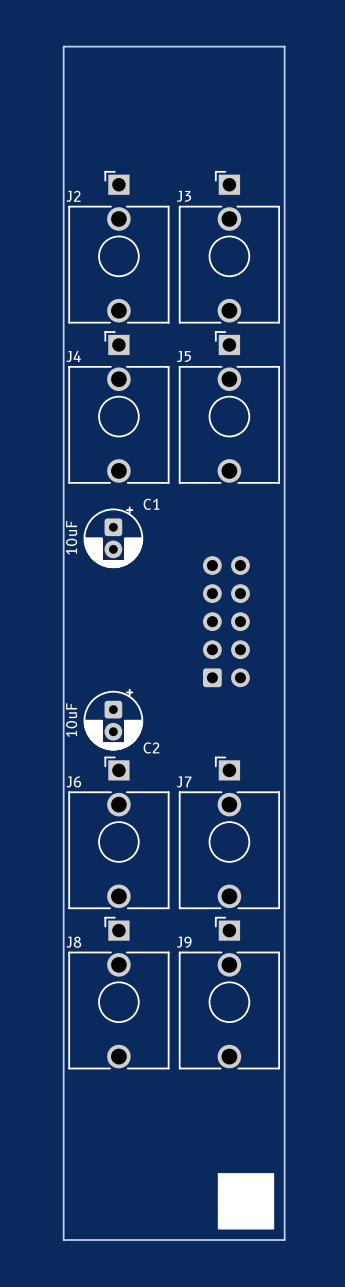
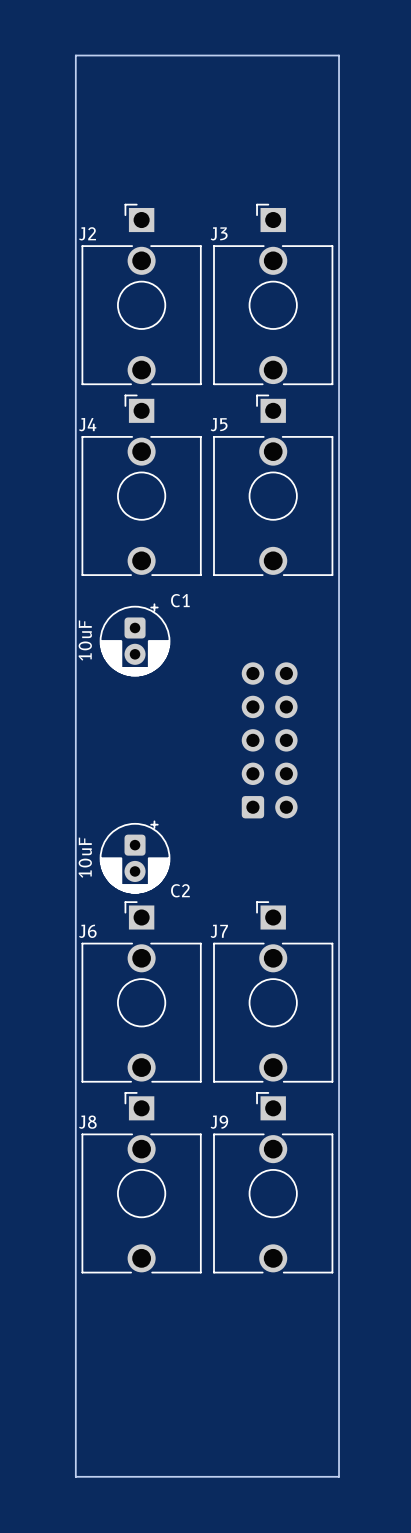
drawing: [217, 1173, 275, 1230] -> none

